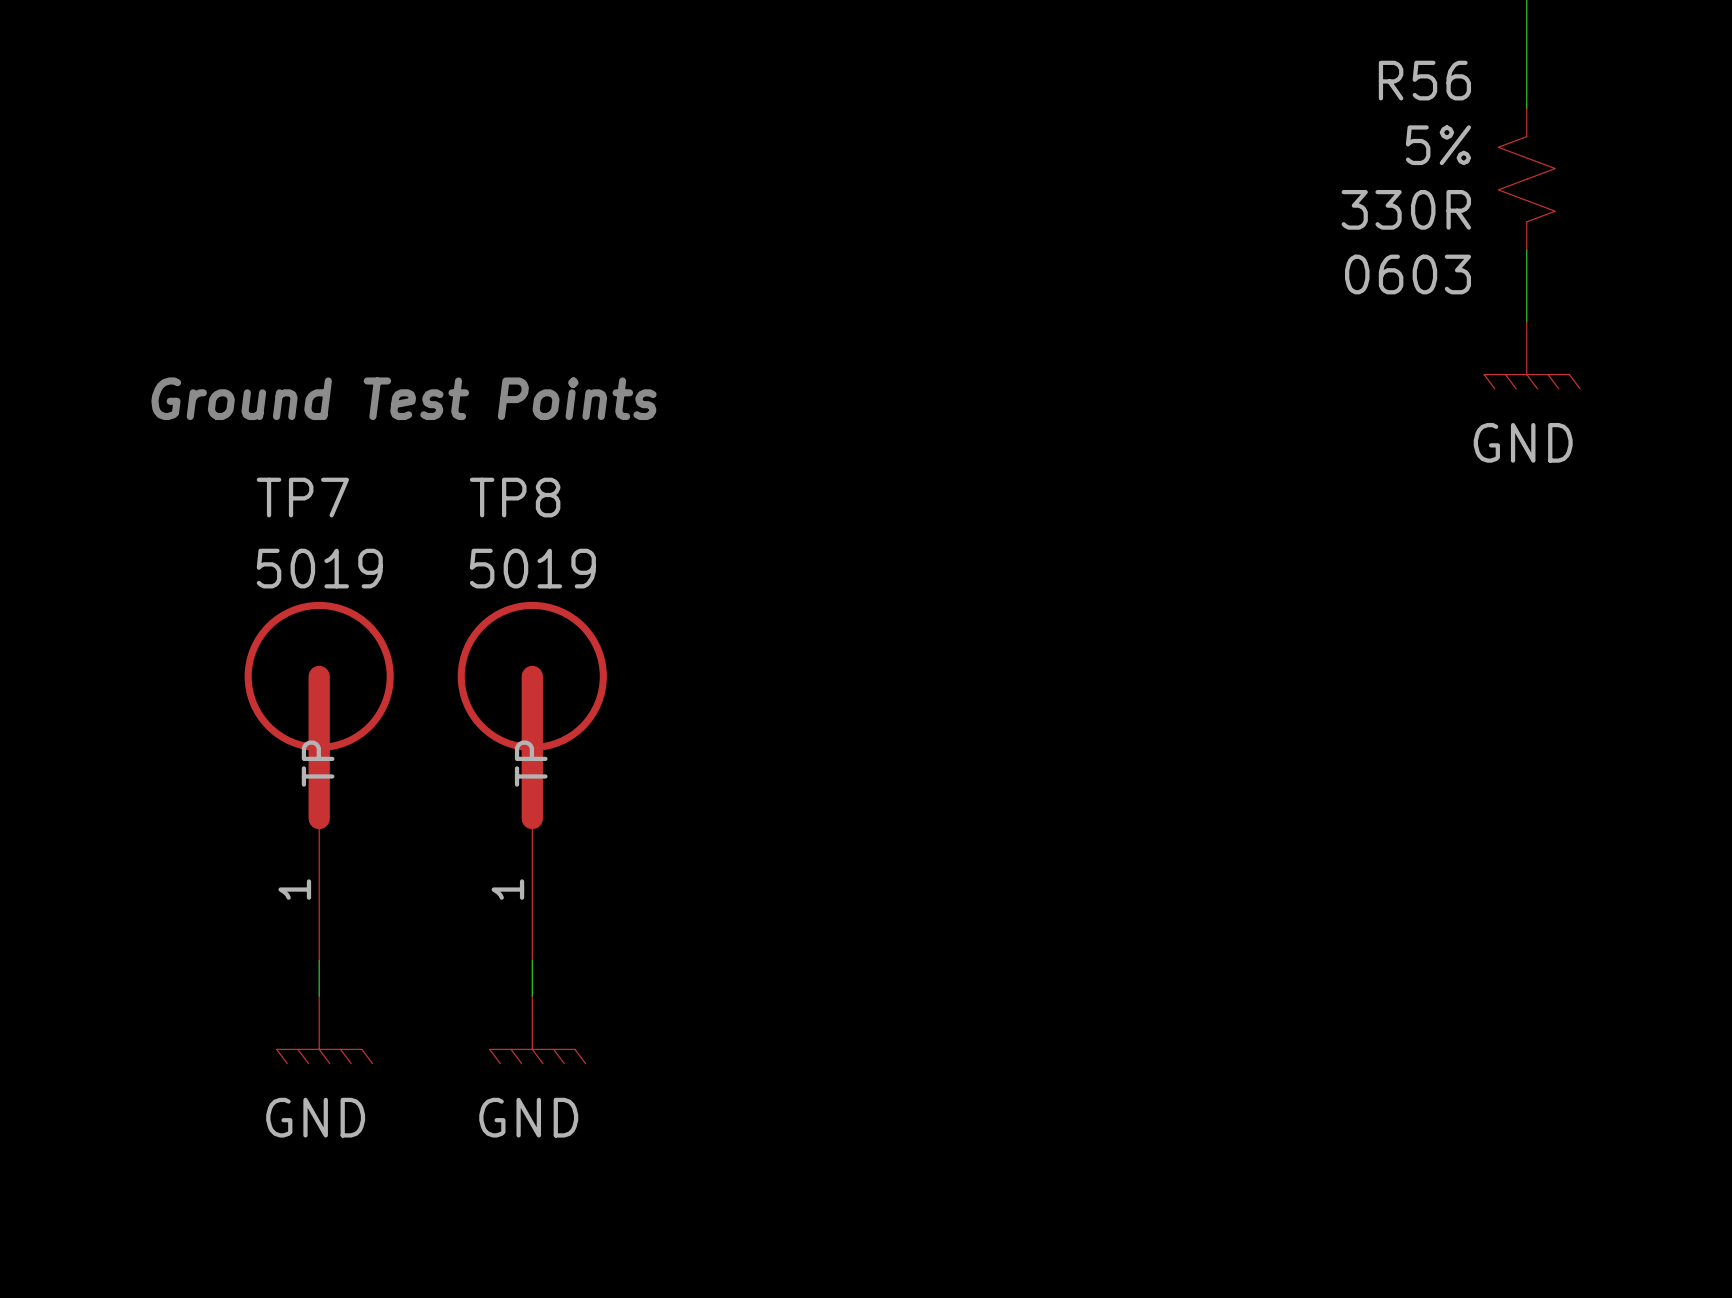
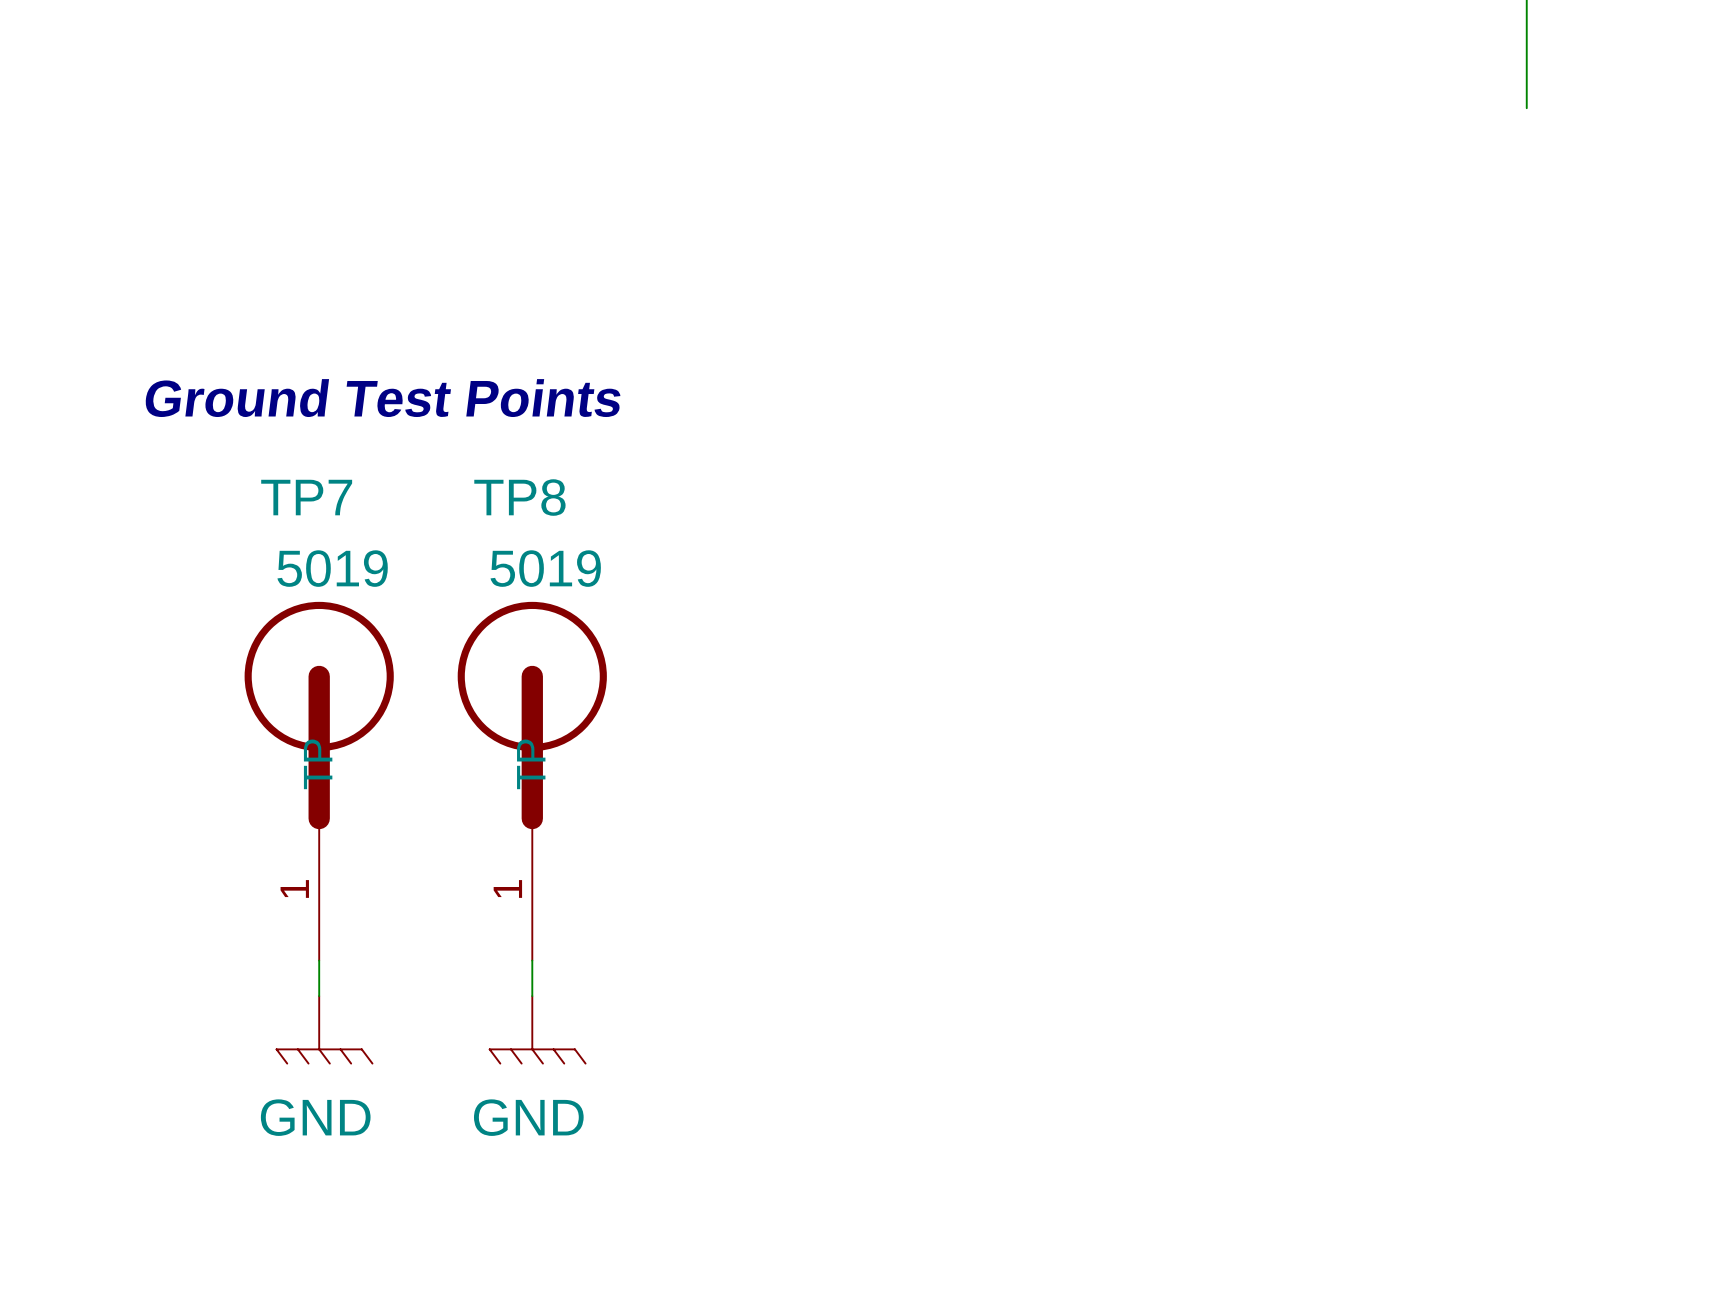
R56: (1526, 179) -> none
wire: (1526, 250) (1526, 321) -> none
power symbol: GND (1532, 355) -> none

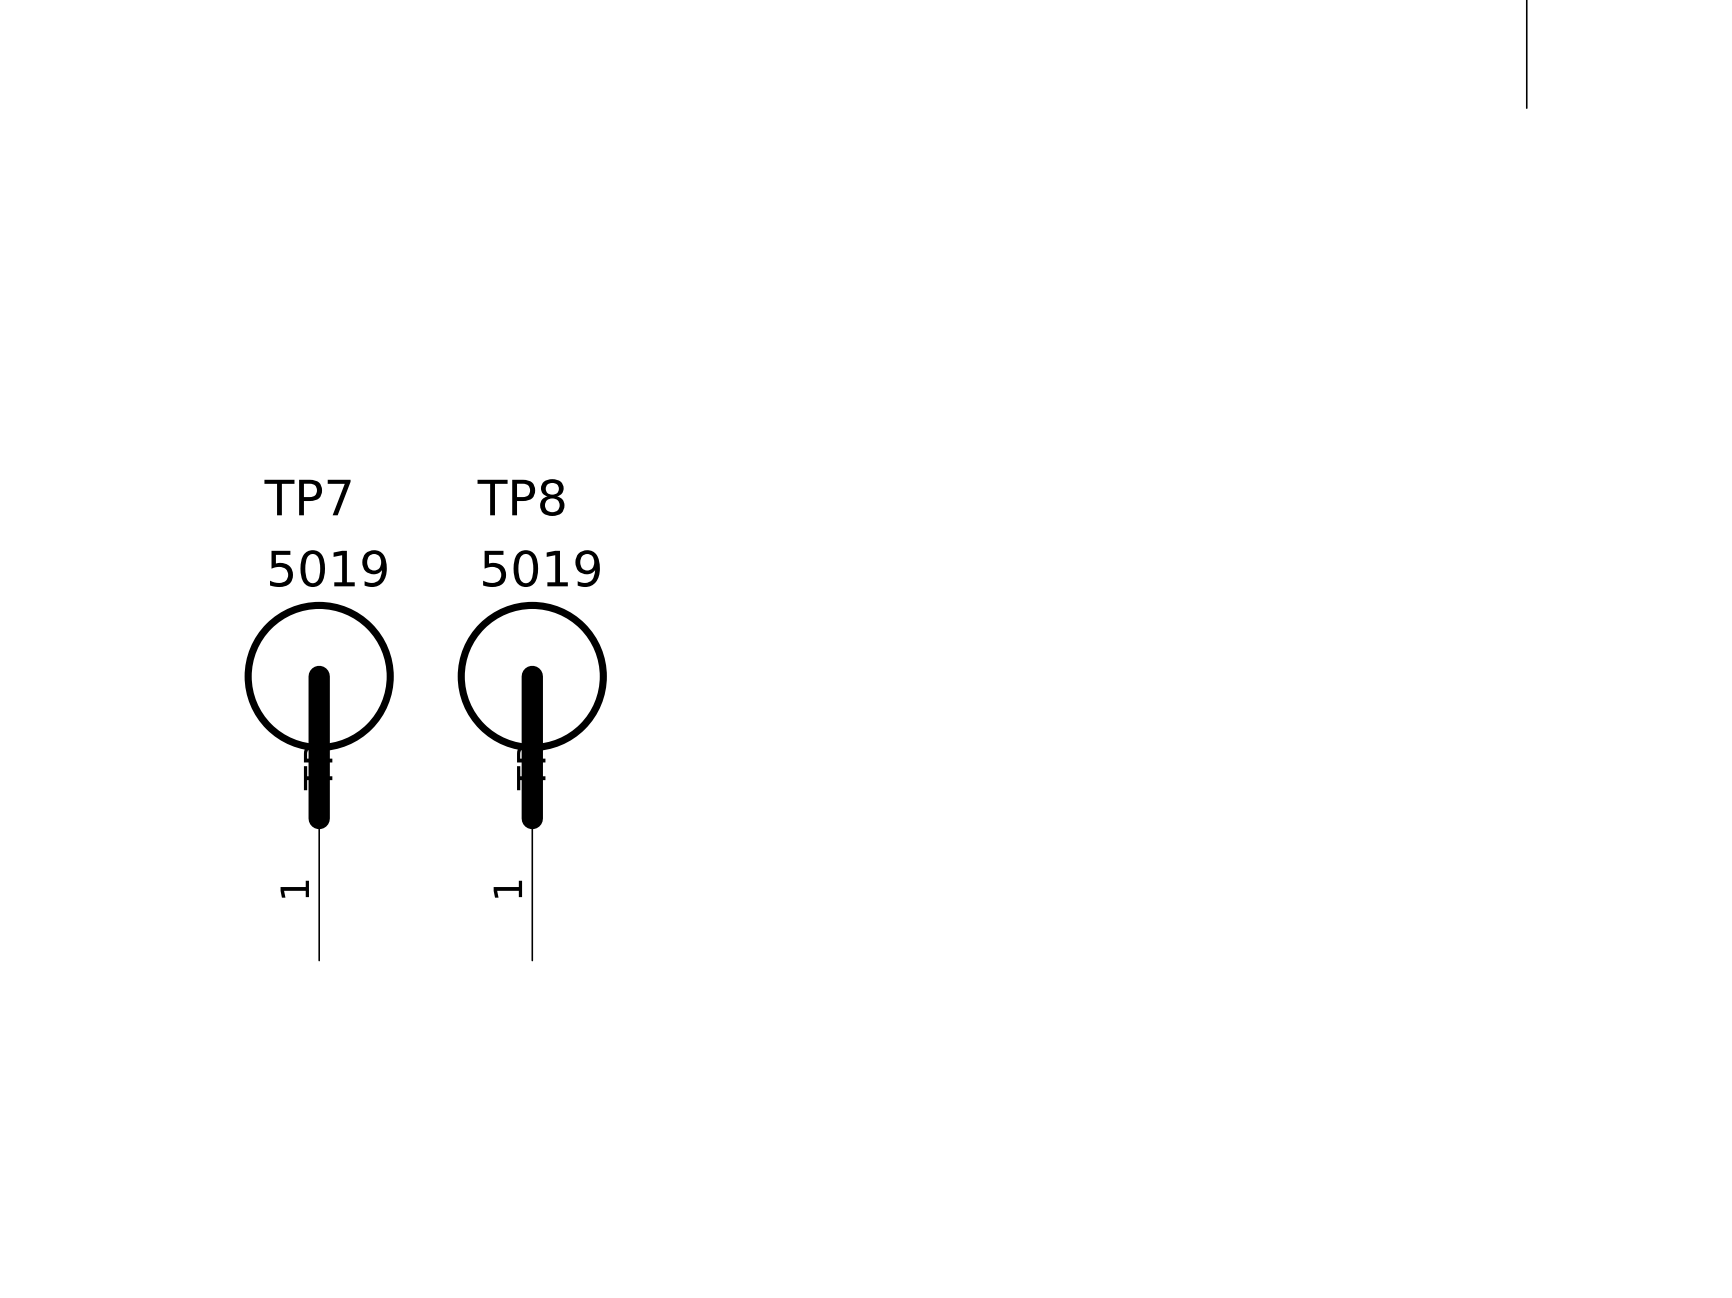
text: Ground Test Points (382, 398) -> none
wire: (319, 960) (319, 996) -> none
wire: (532, 960) (532, 996) -> none
power symbol: GND (324, 1029) -> none
power symbol: GND (537, 1029) -> none

